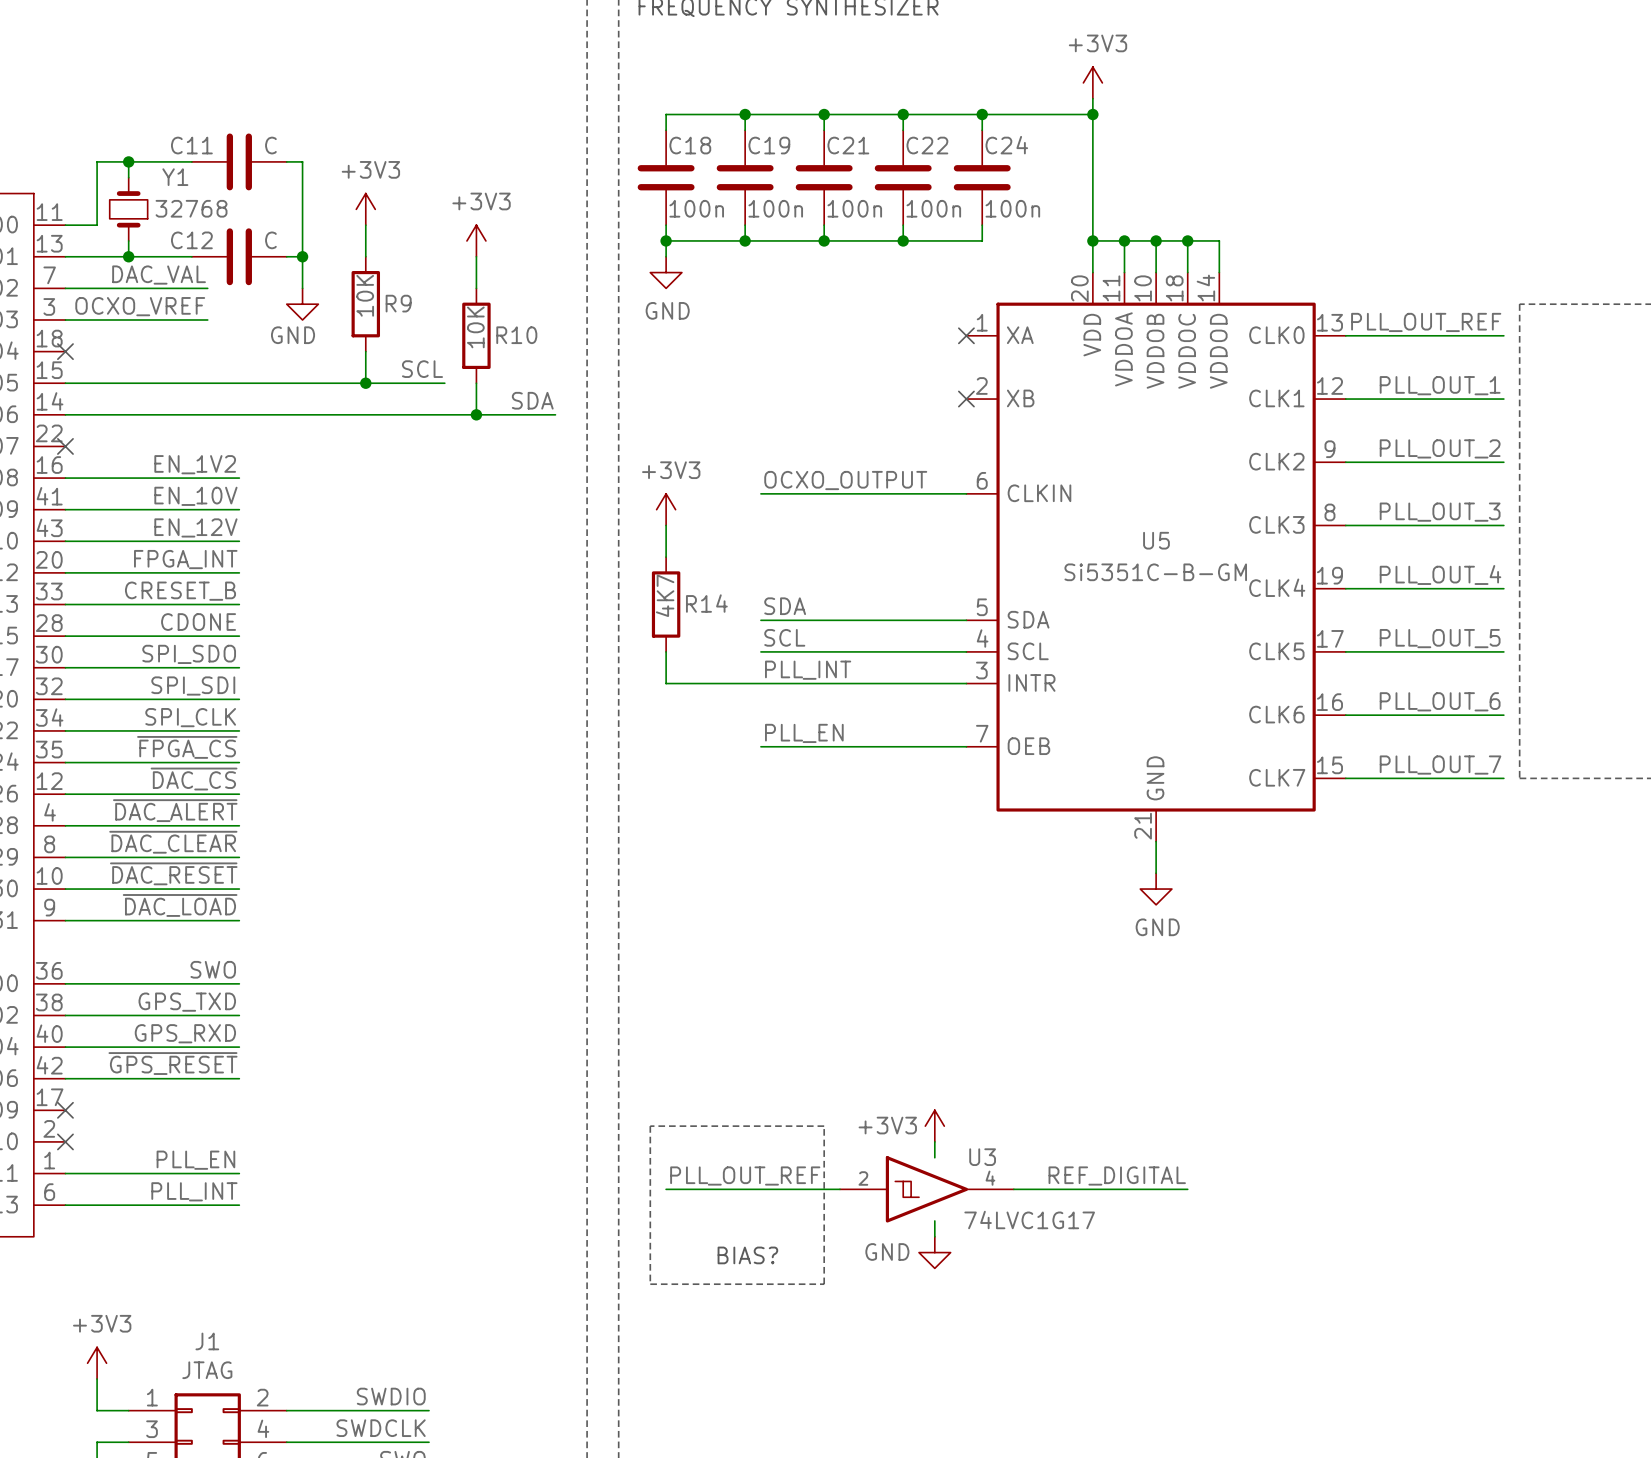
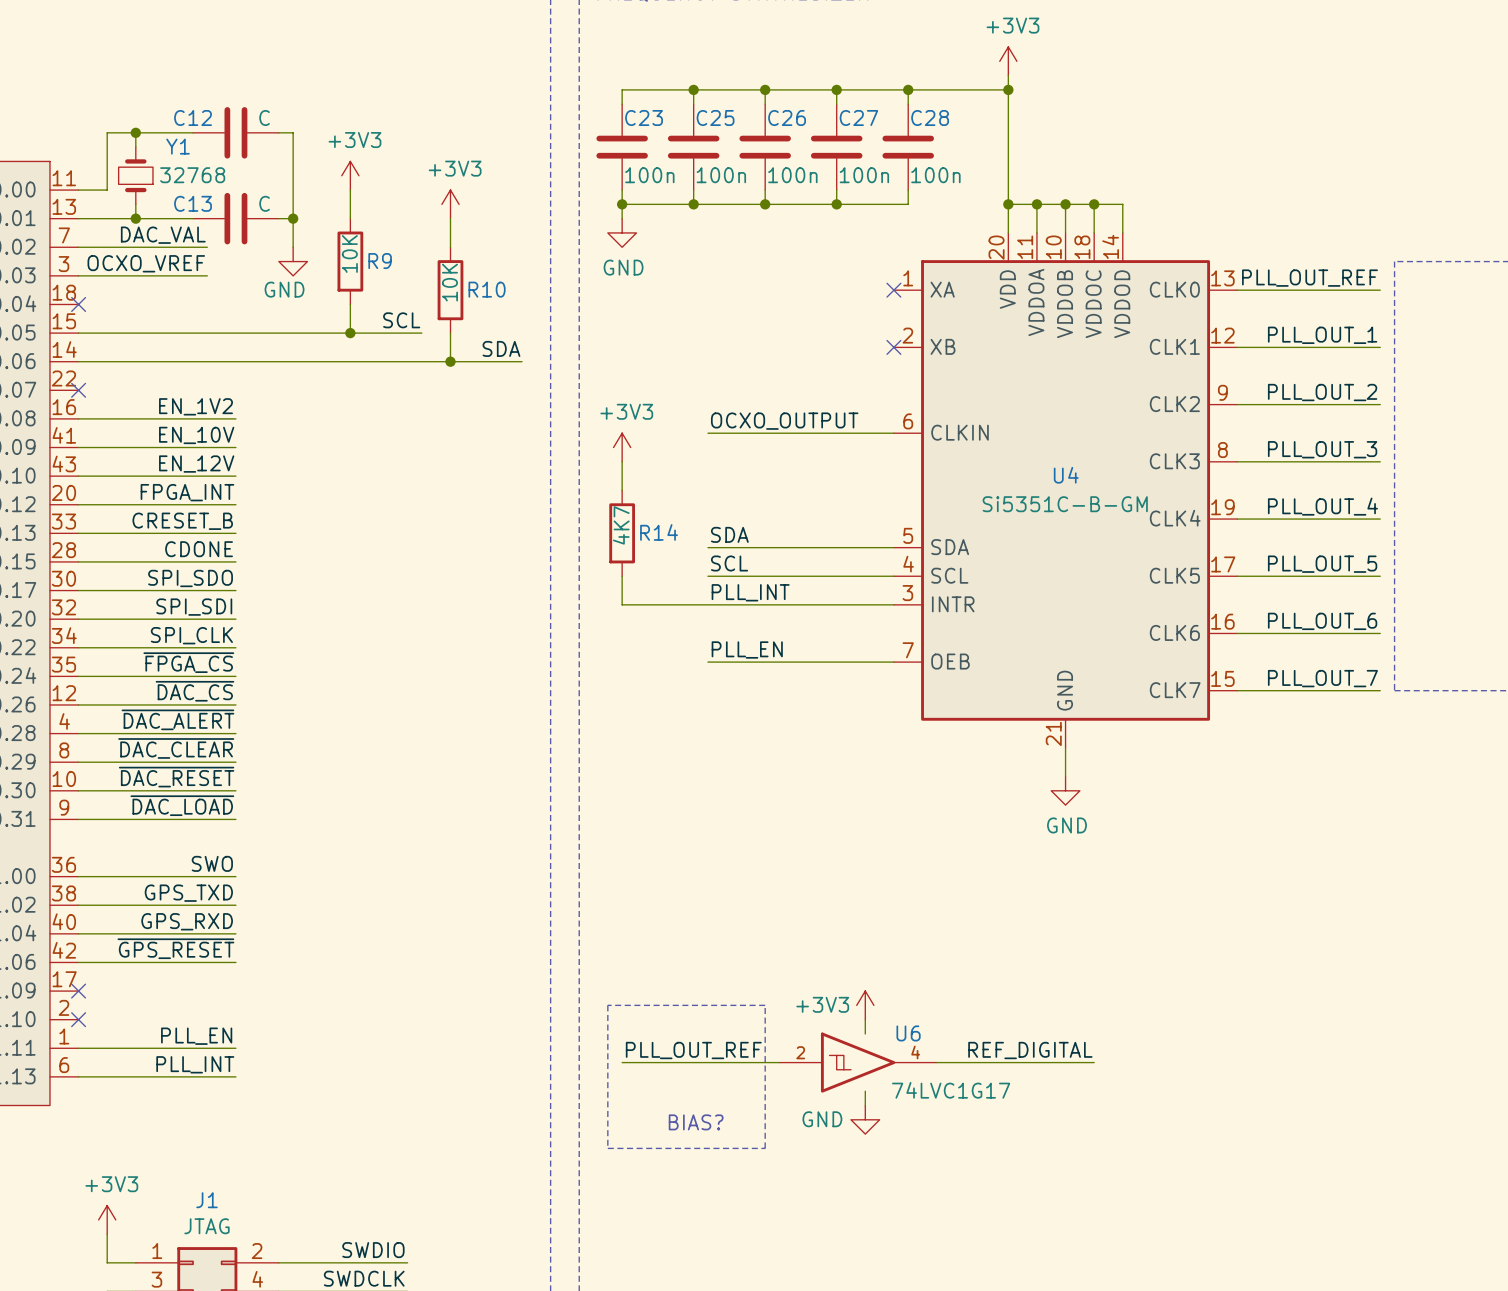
C11 name: C11 (191, 145) -> C12 (193, 118)
C18 name: C18 (690, 145) -> C23 (644, 118)
C19 name: C19 (769, 145) -> C25 (715, 118)
C21 name: C21 (848, 145) -> C26 (787, 118)
C22 name: C22 (927, 145) -> C27 (858, 118)
C24 name: C24 (1006, 145) -> C28 (930, 118)
C12 name: C12 (191, 240) -> C13 (193, 203)
U5 name: U5 (1156, 540) -> U4 (1066, 475)
U3 name: U3 (982, 1157) -> U6 (908, 1033)

